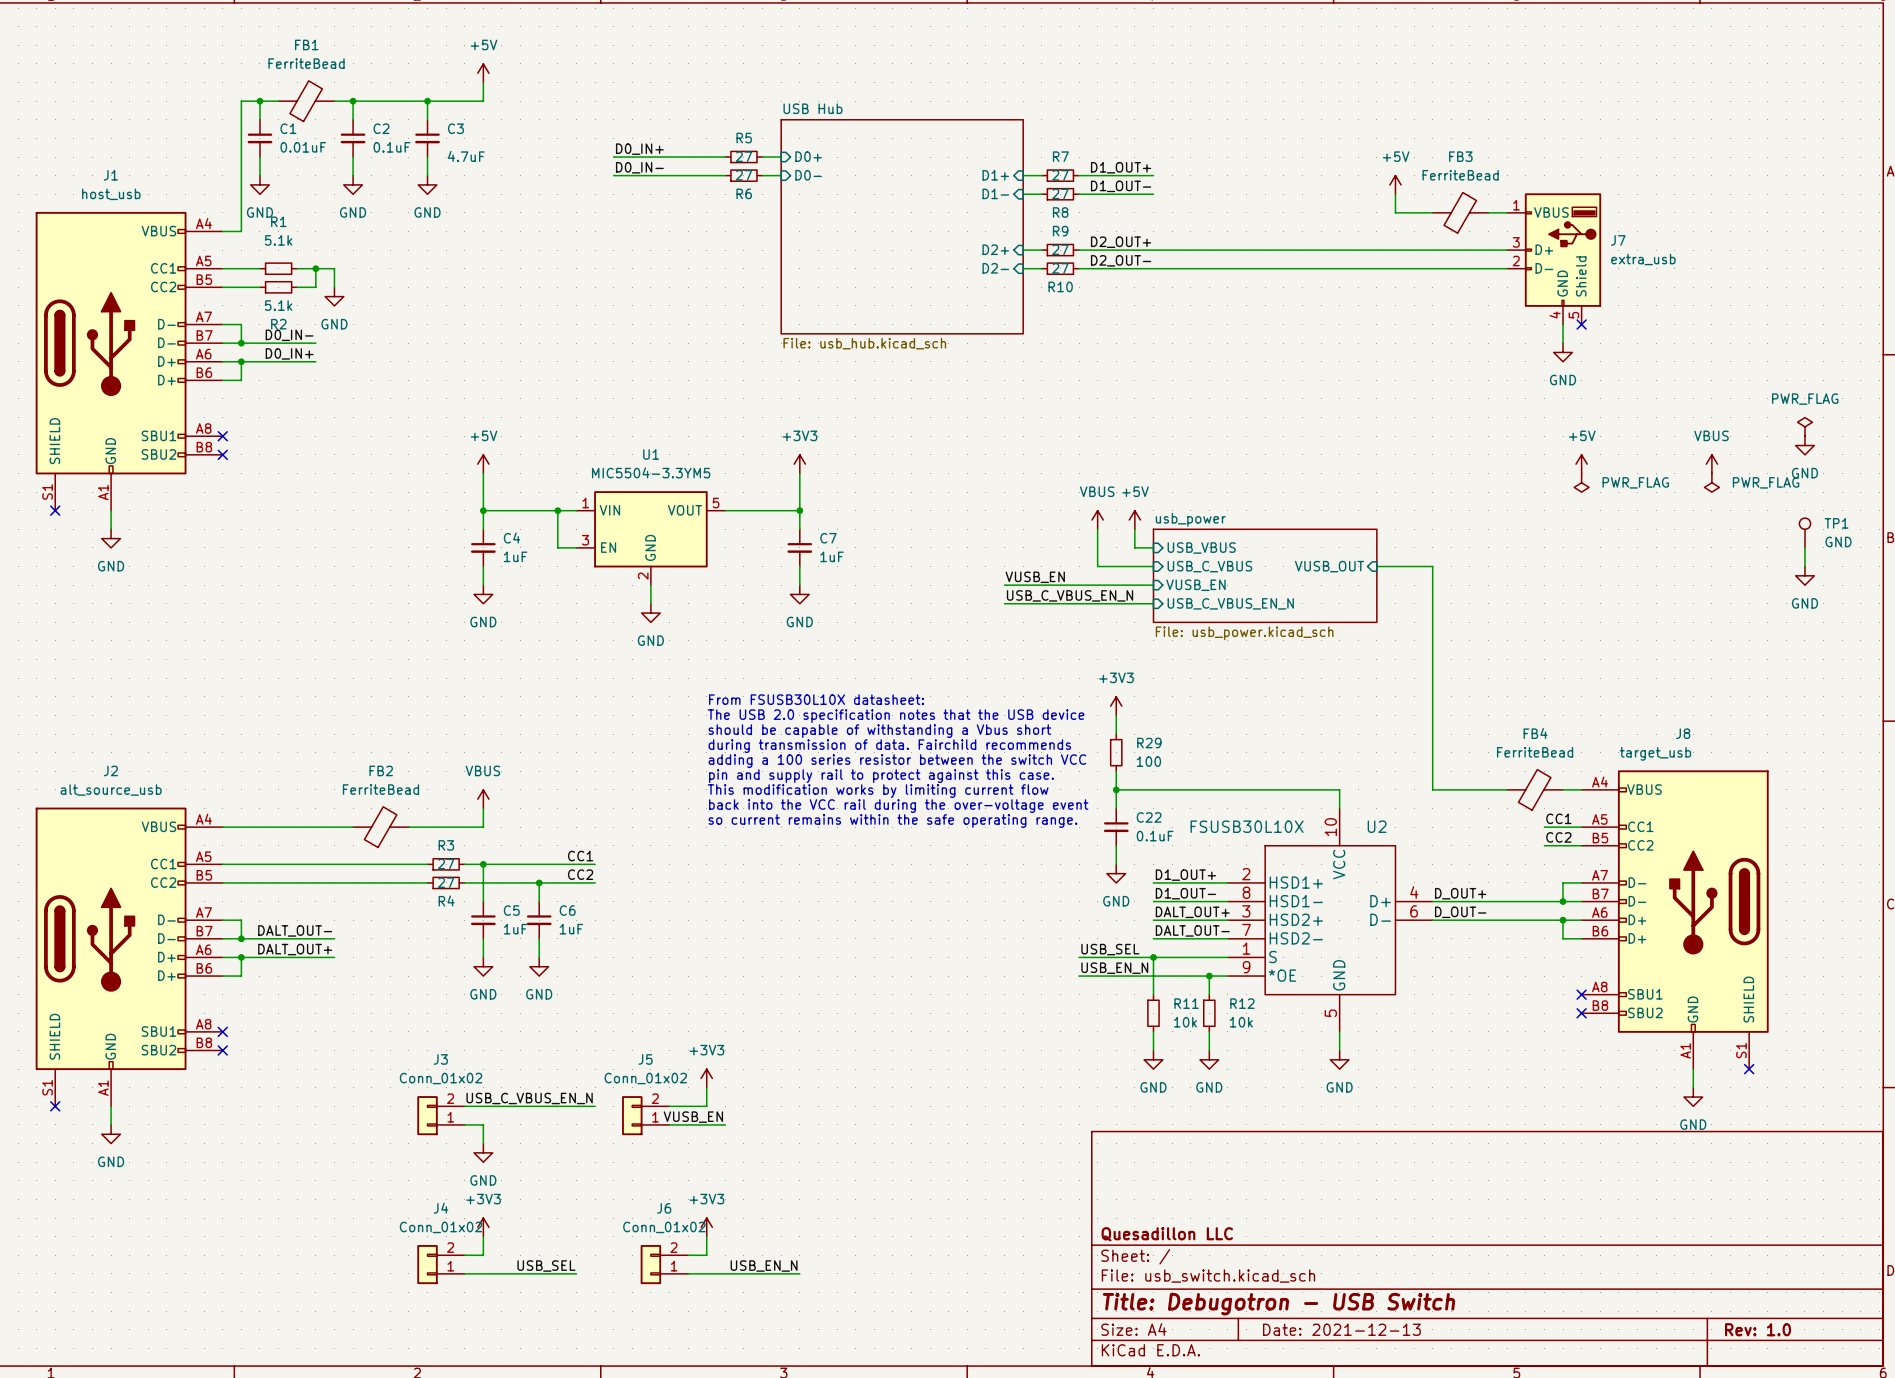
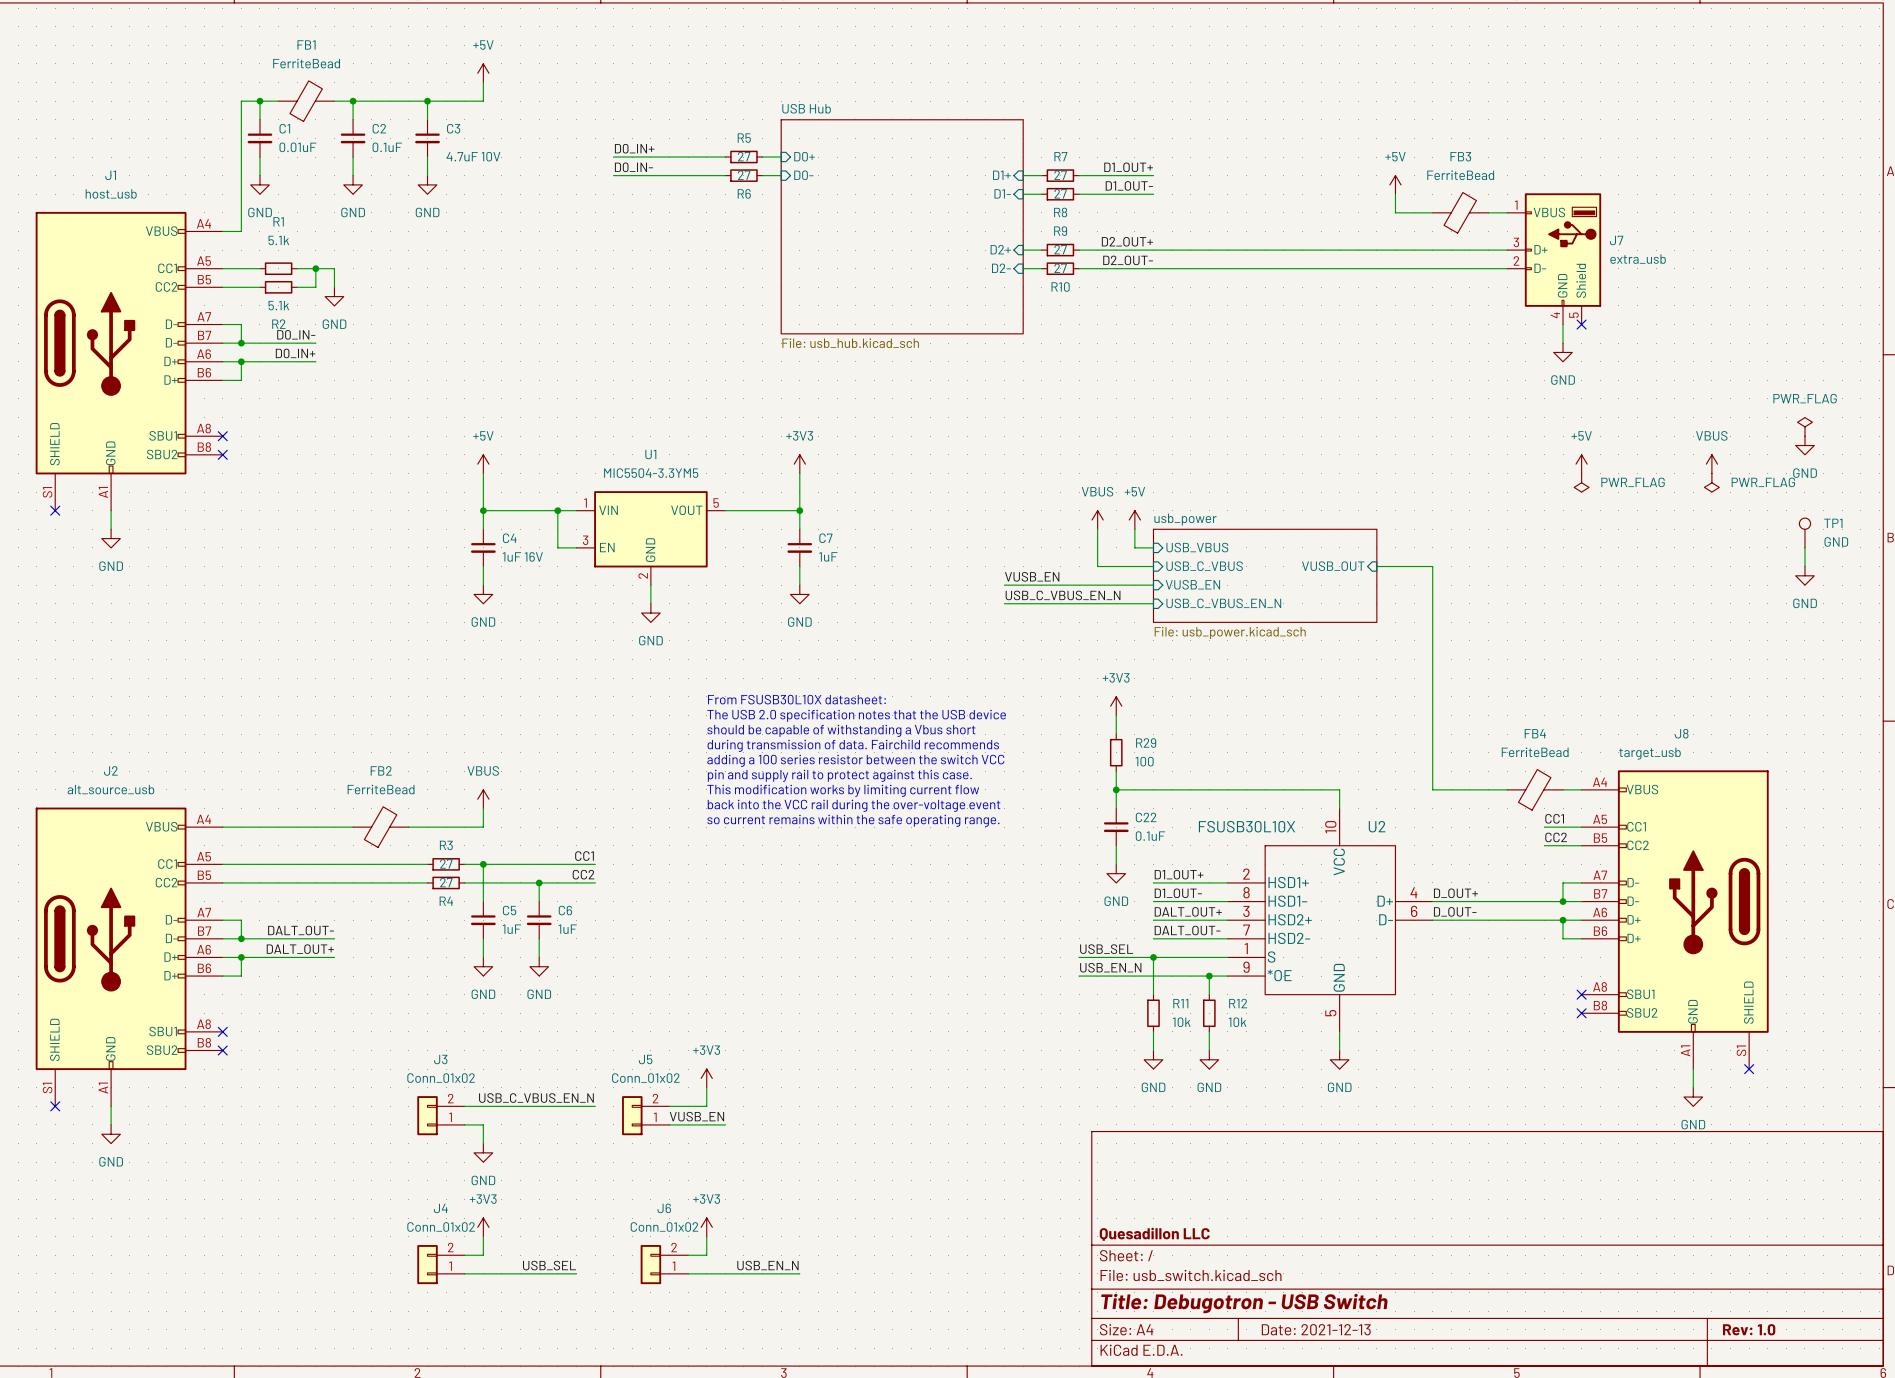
C3 value: 4.7uF (466, 156) -> 4.7uF 10V (473, 156)
C4 value: 1uF (515, 556) -> 1uF 16V (522, 556)

